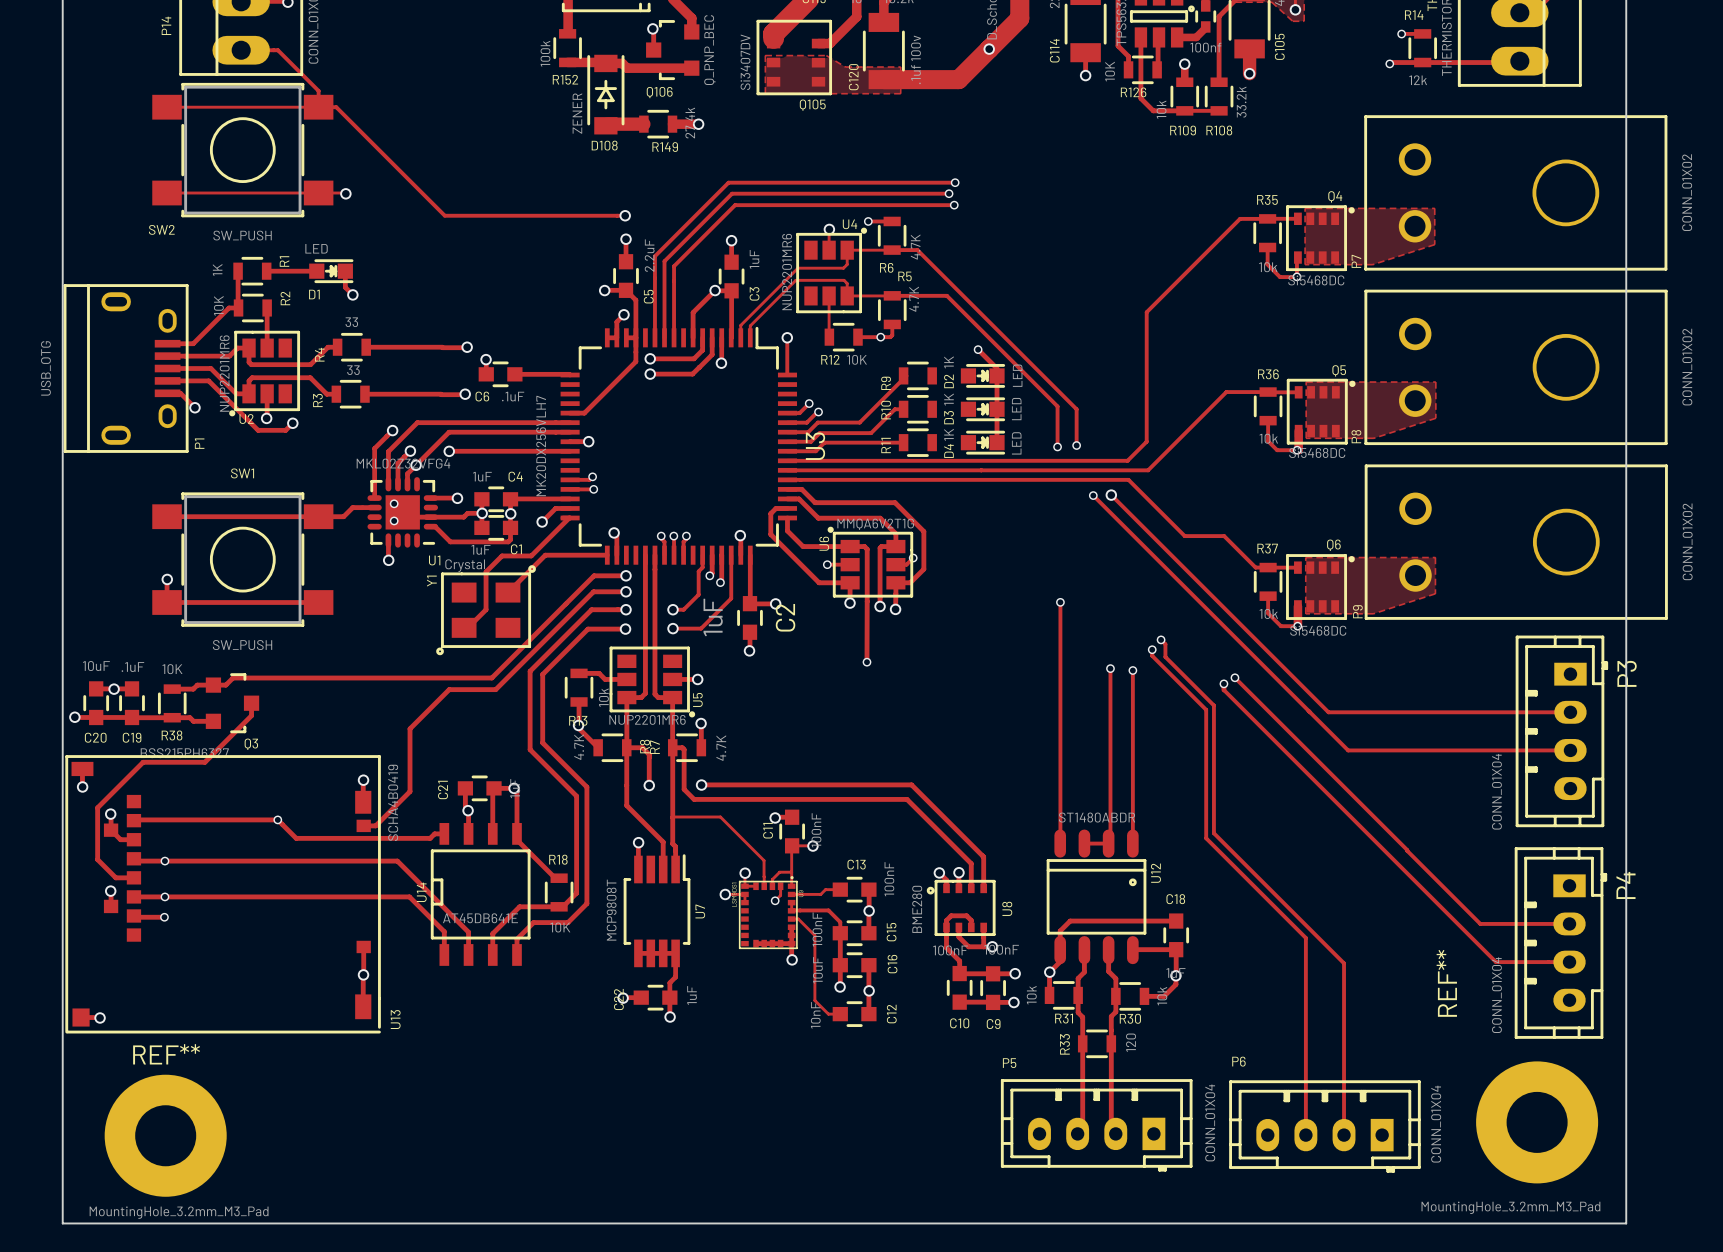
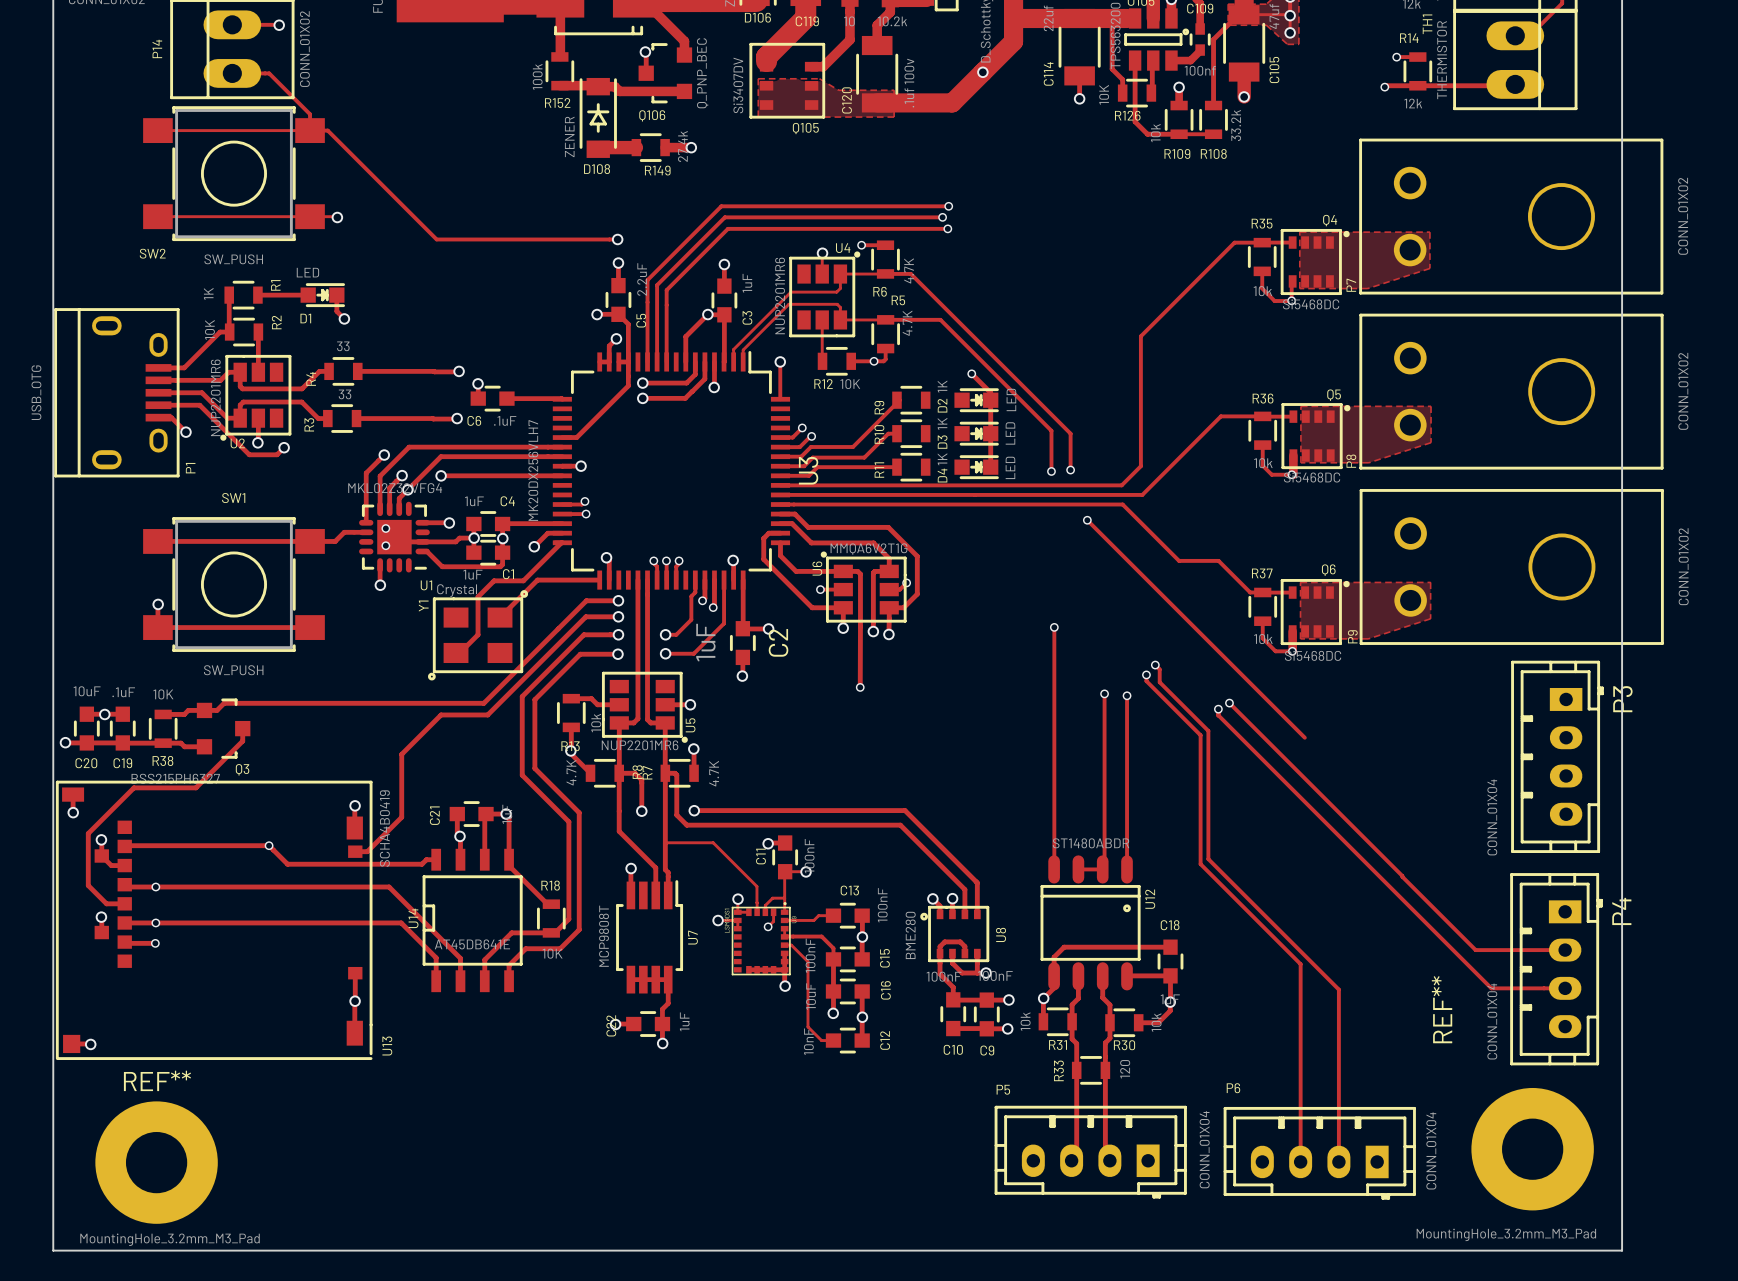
track: (1111, 495) (1328, 712) (1570, 712) -> none
via: (1111, 495) -> none
track: (1310, 712) (1348, 750) (1570, 750) -> none

